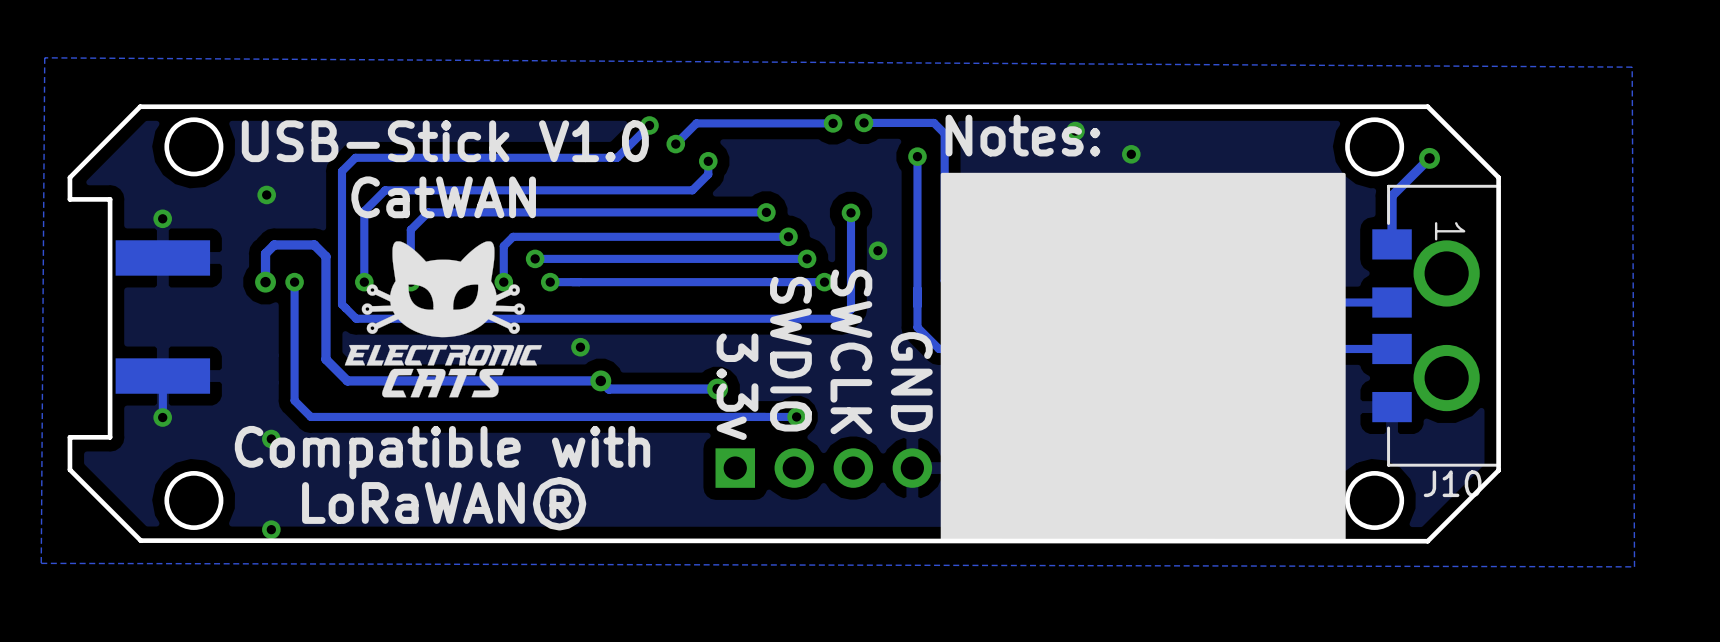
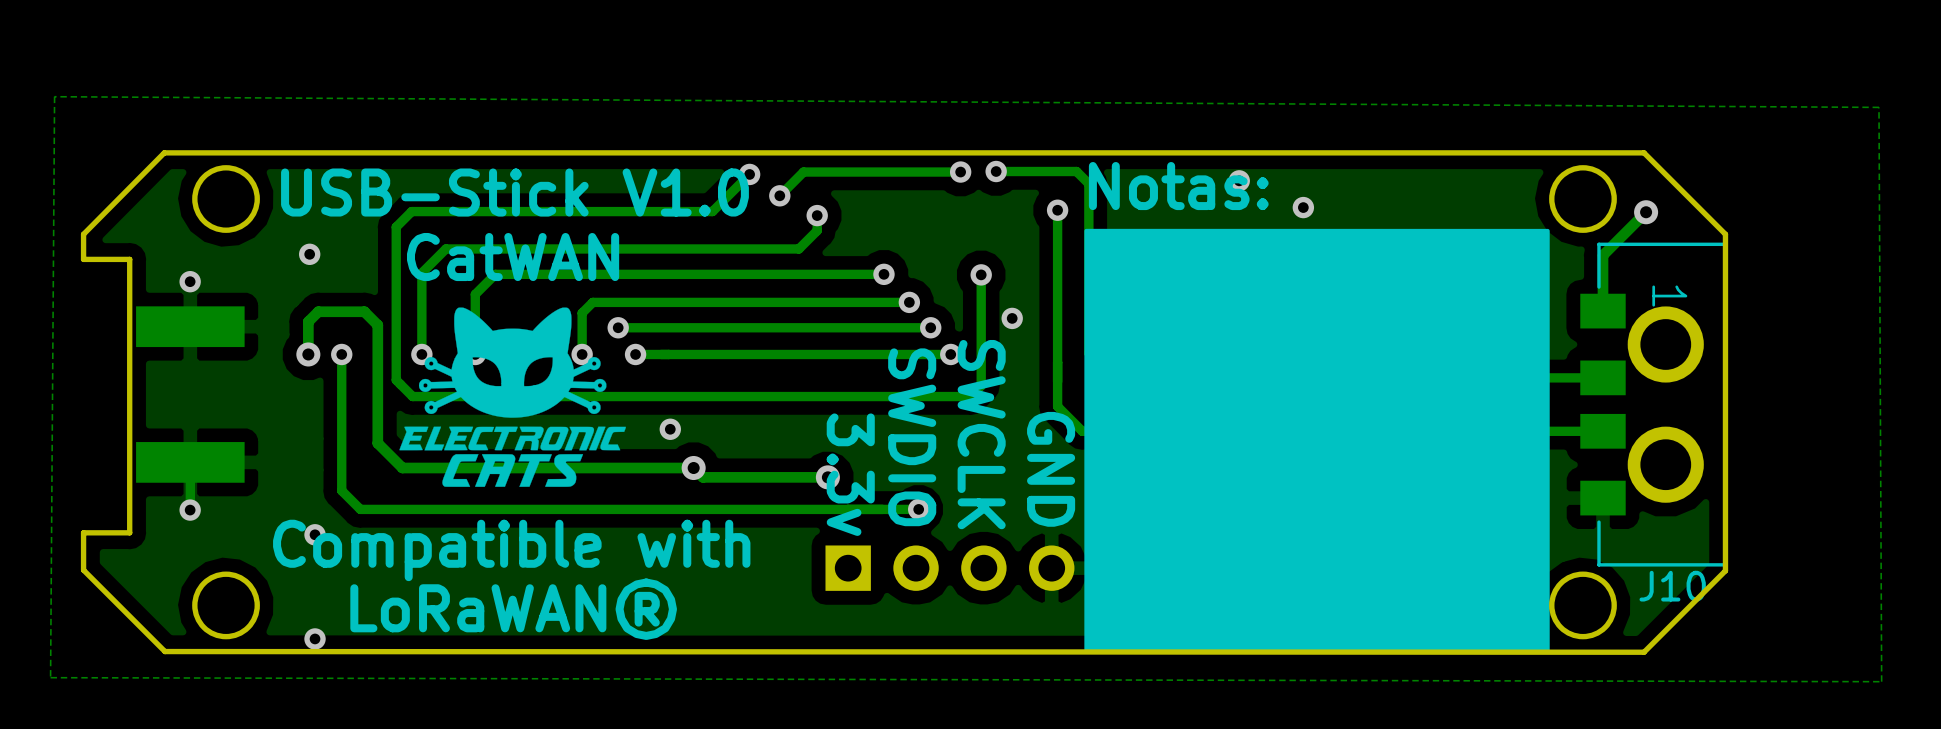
text: Notes: (1022, 135) -> Notas: (1178, 186)

